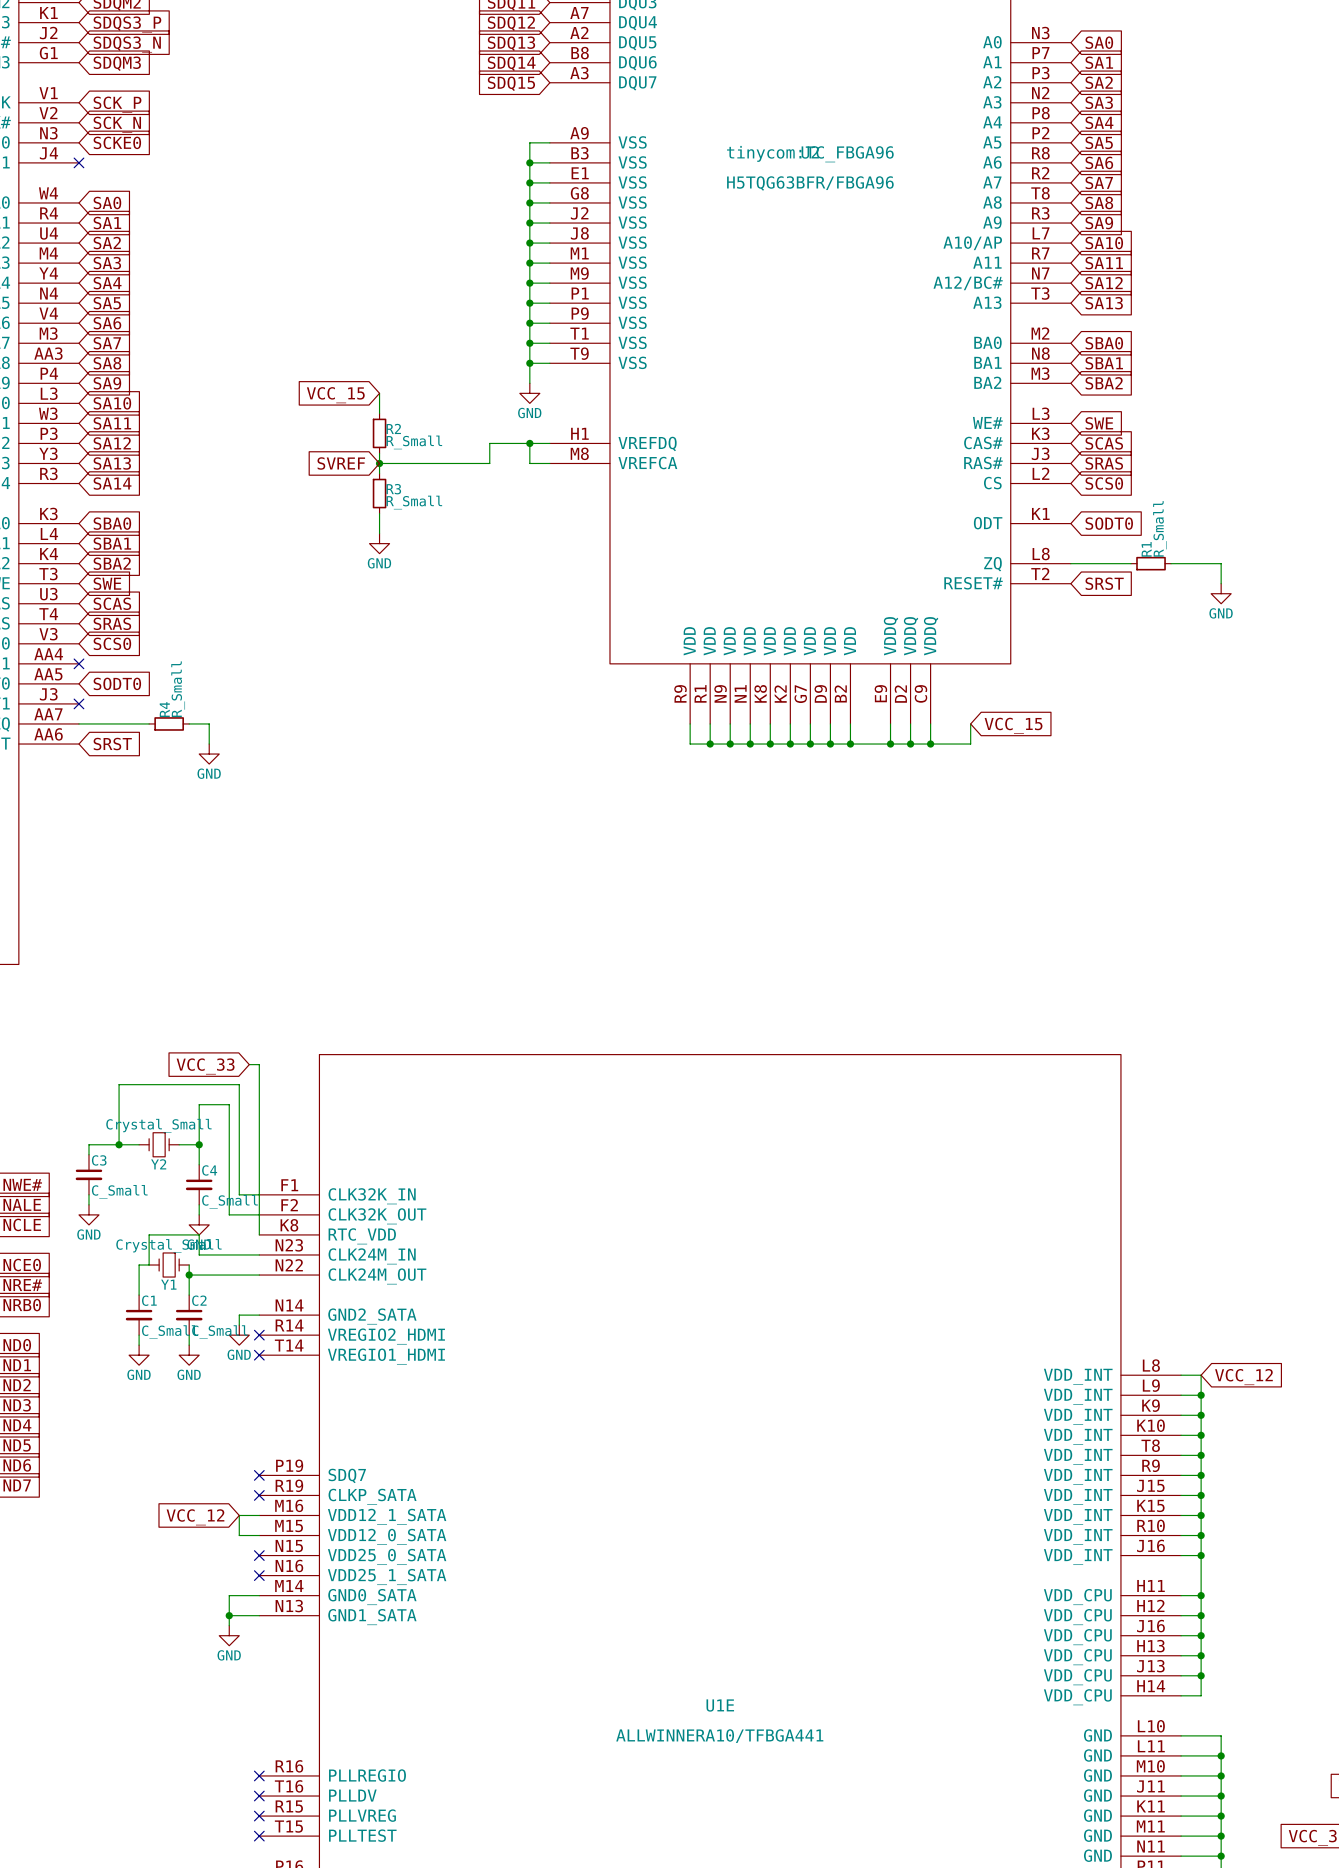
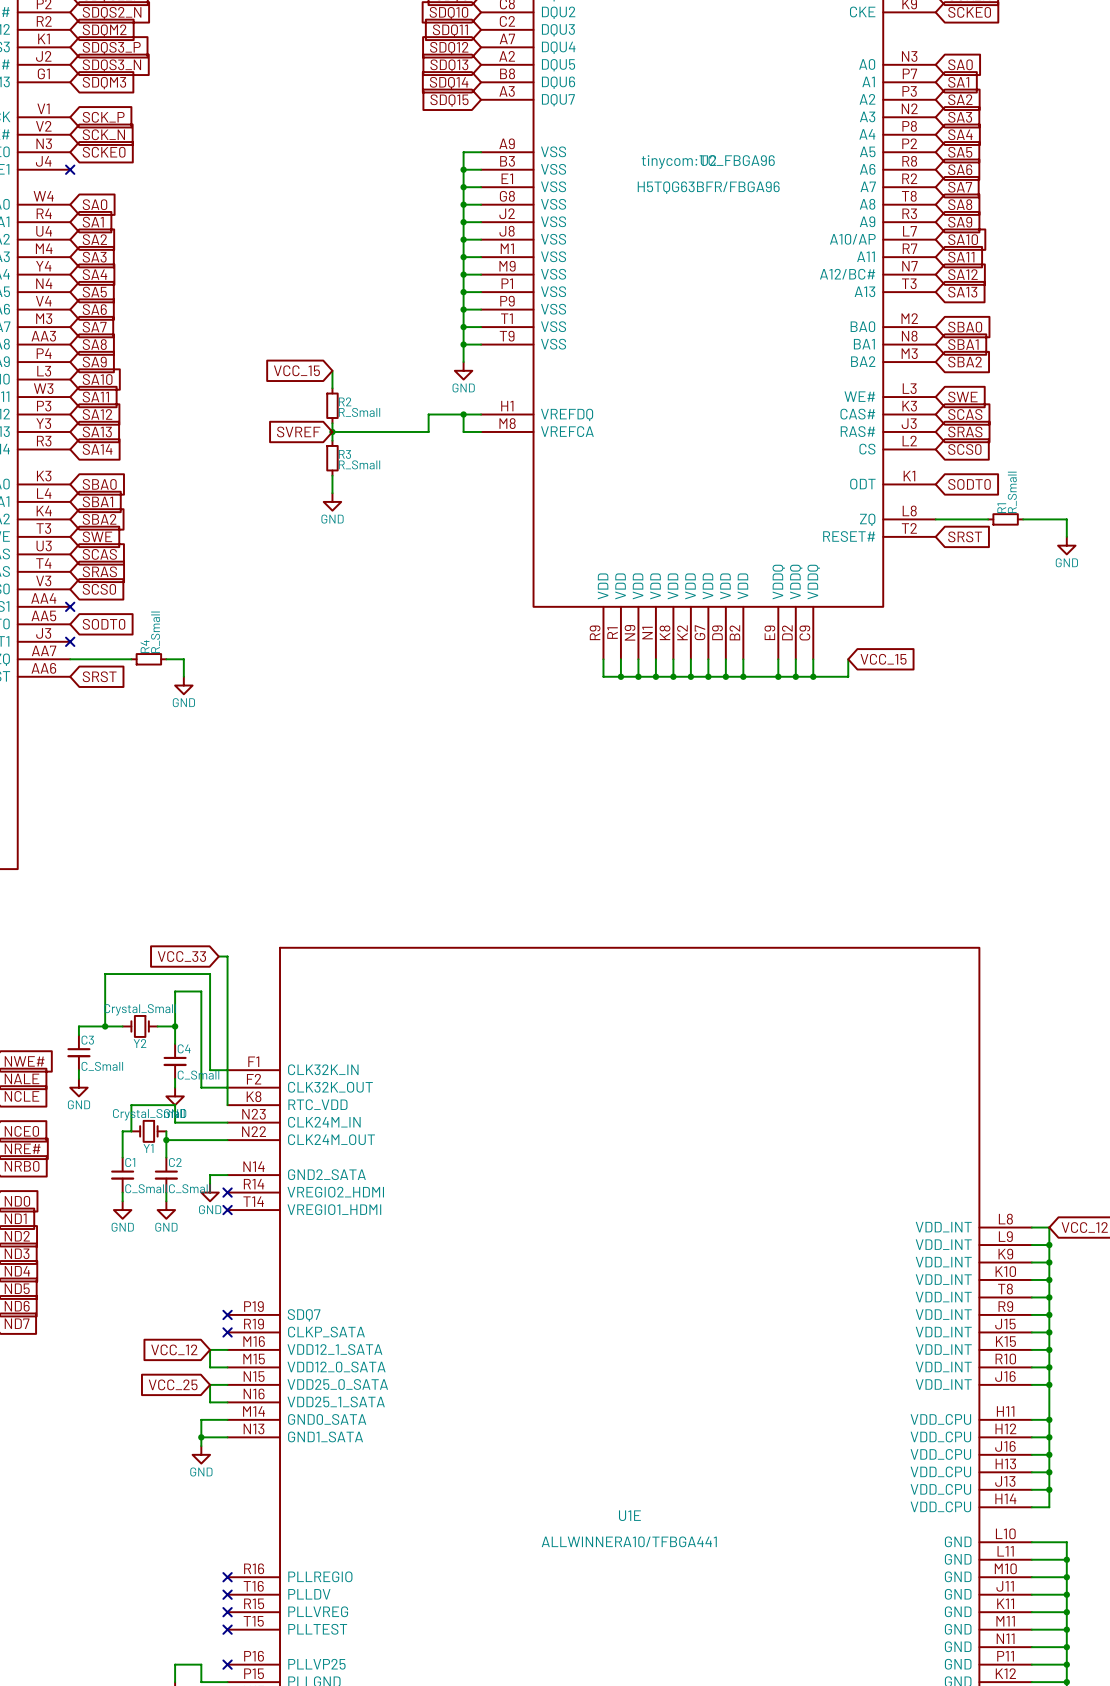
wire: none -> (227, 1384) (210, 1384) (210, 1402) (227, 1402)
no-connect mark: (259, 1555) -> none
global label: none -> VCC_25 (173, 1384)
no-connect mark: (259, 1575) -> none

